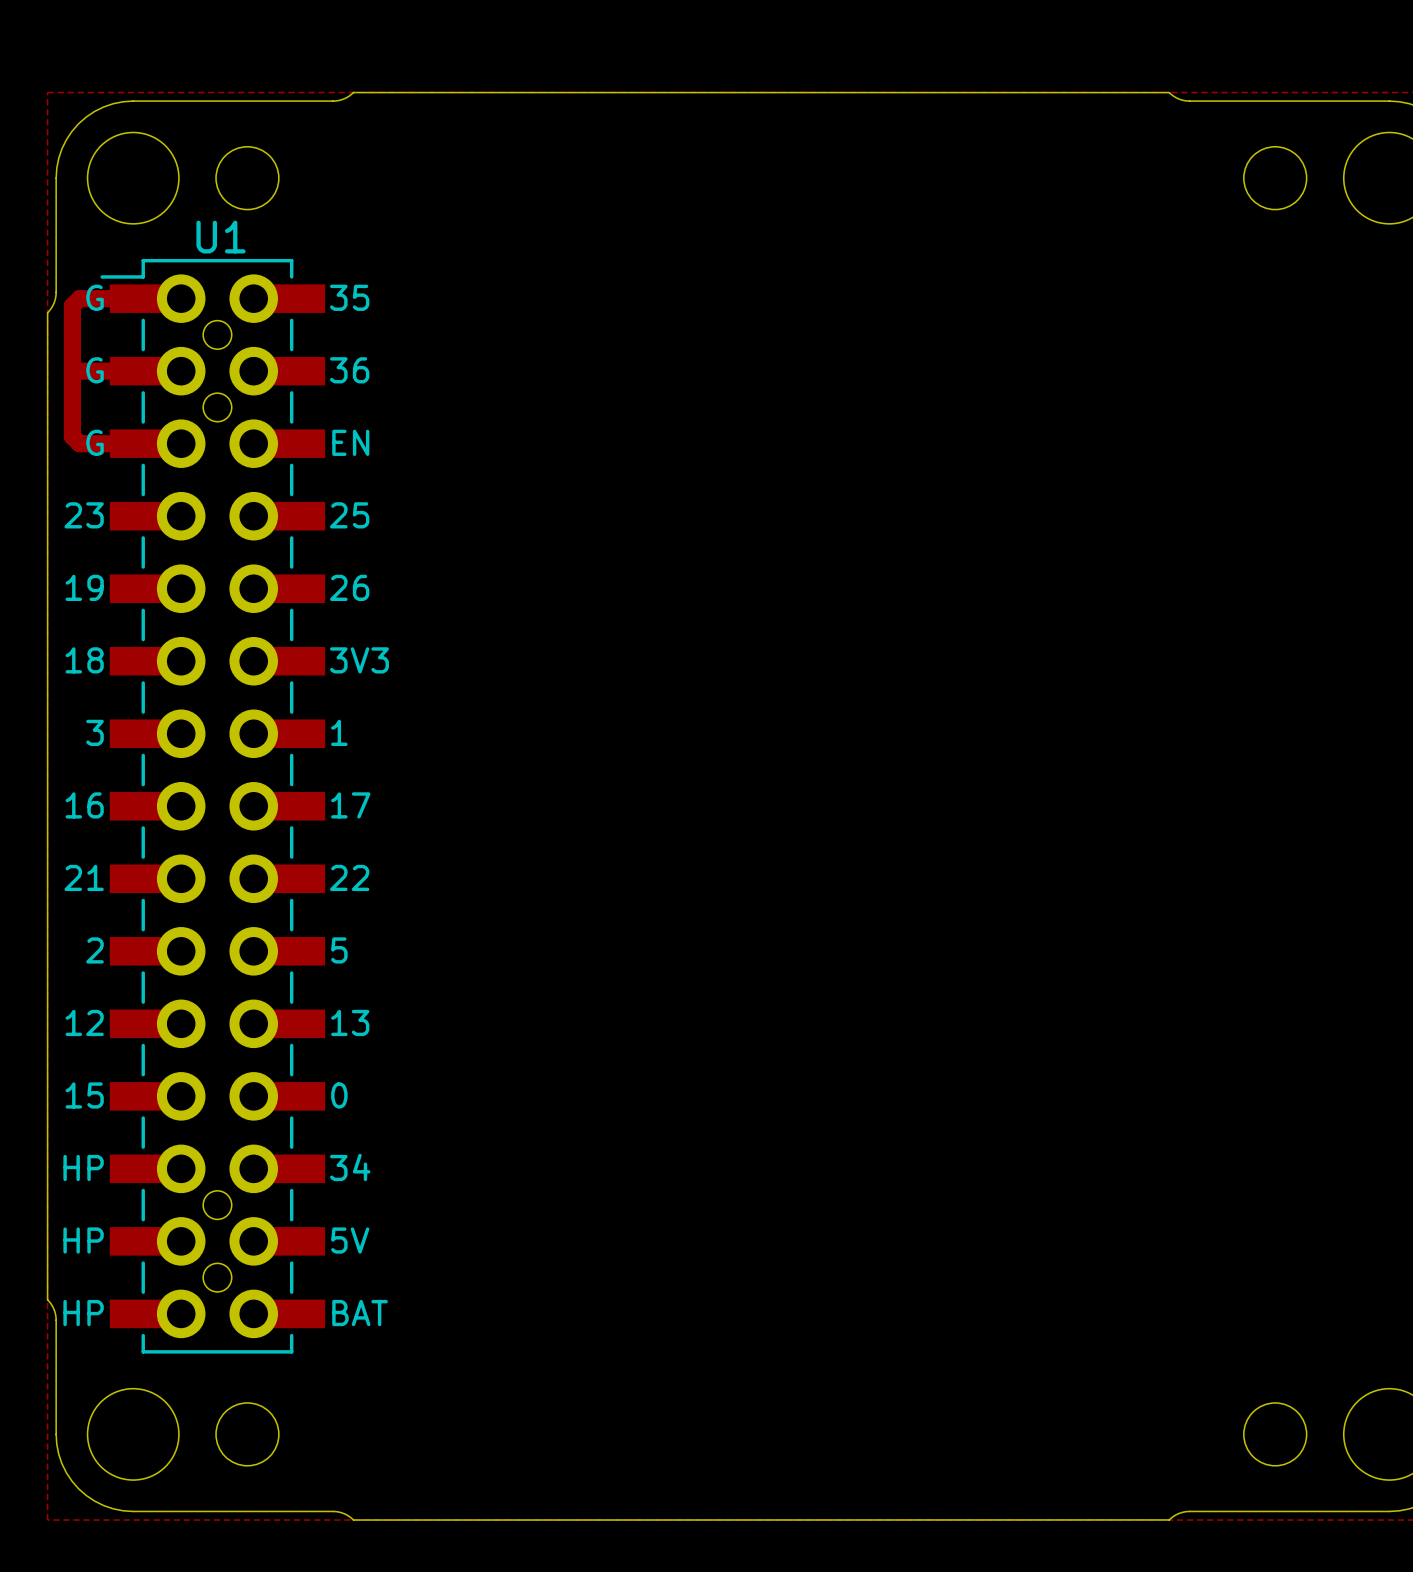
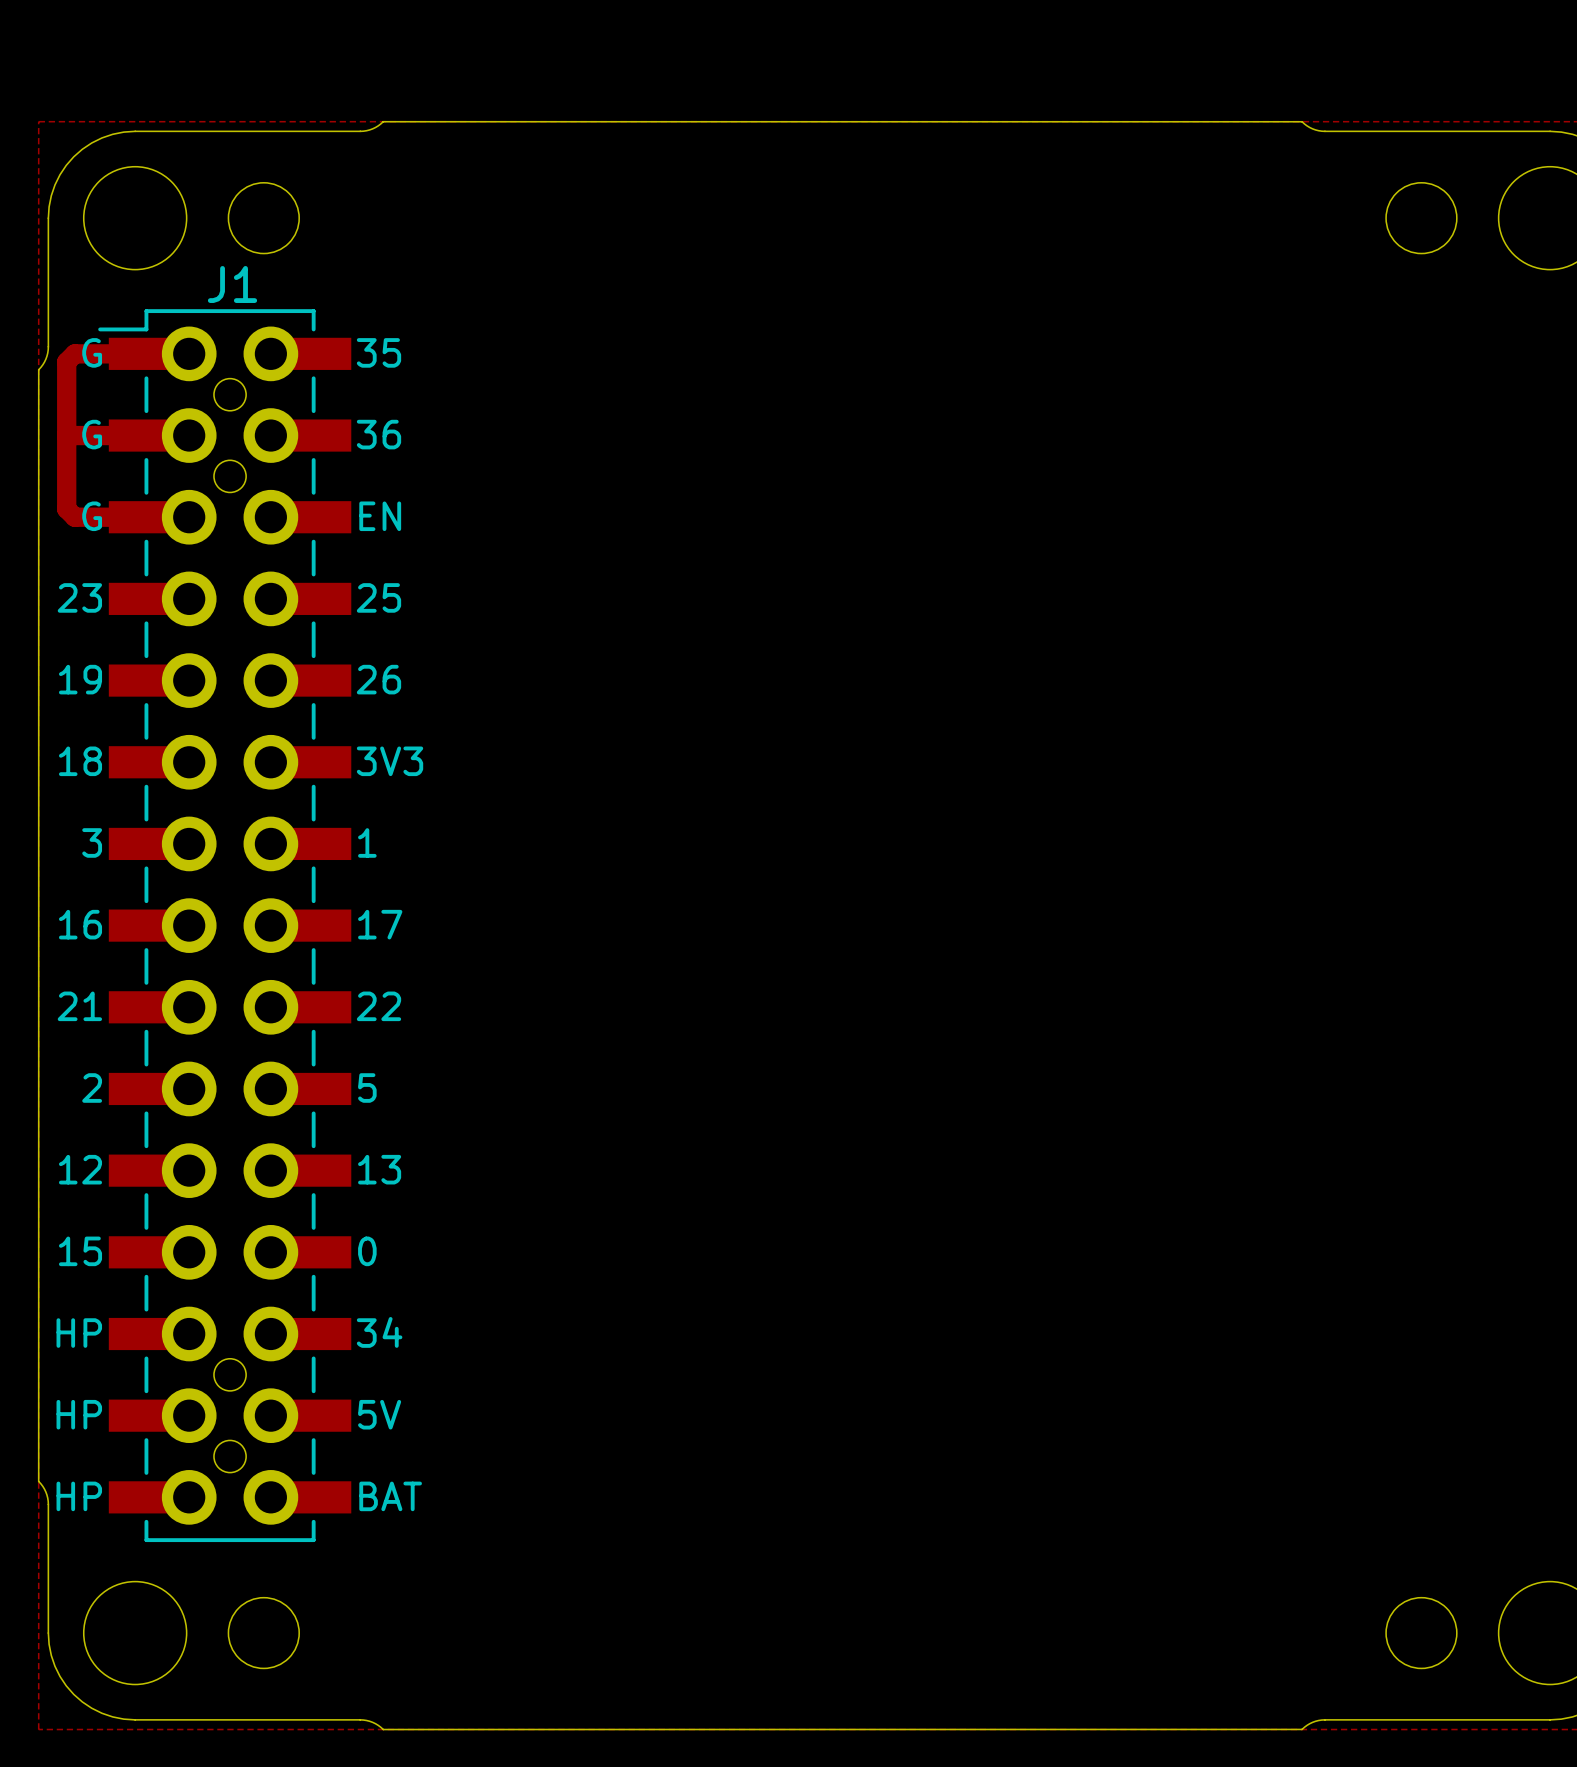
U1 name: U1 (220, 237) -> J1 (232, 284)

